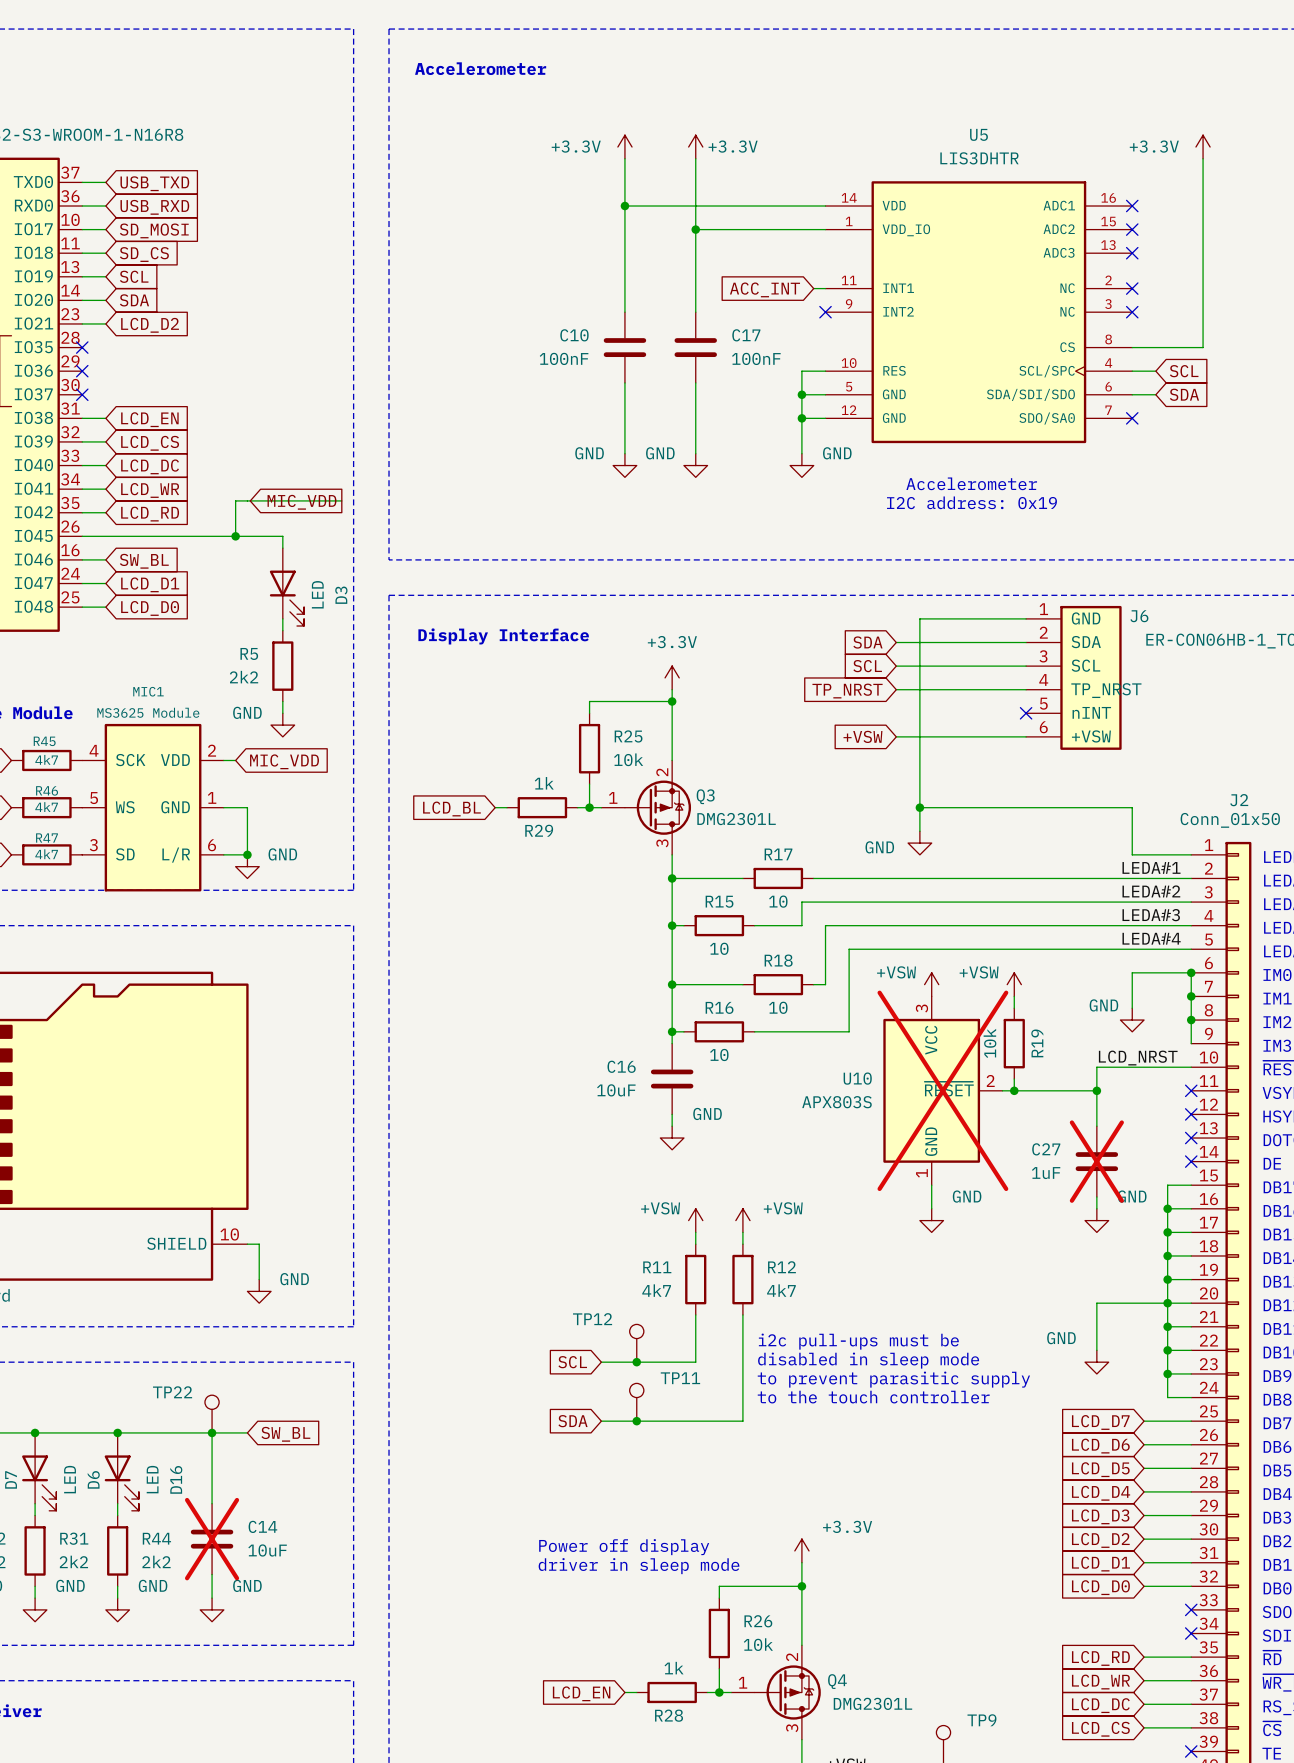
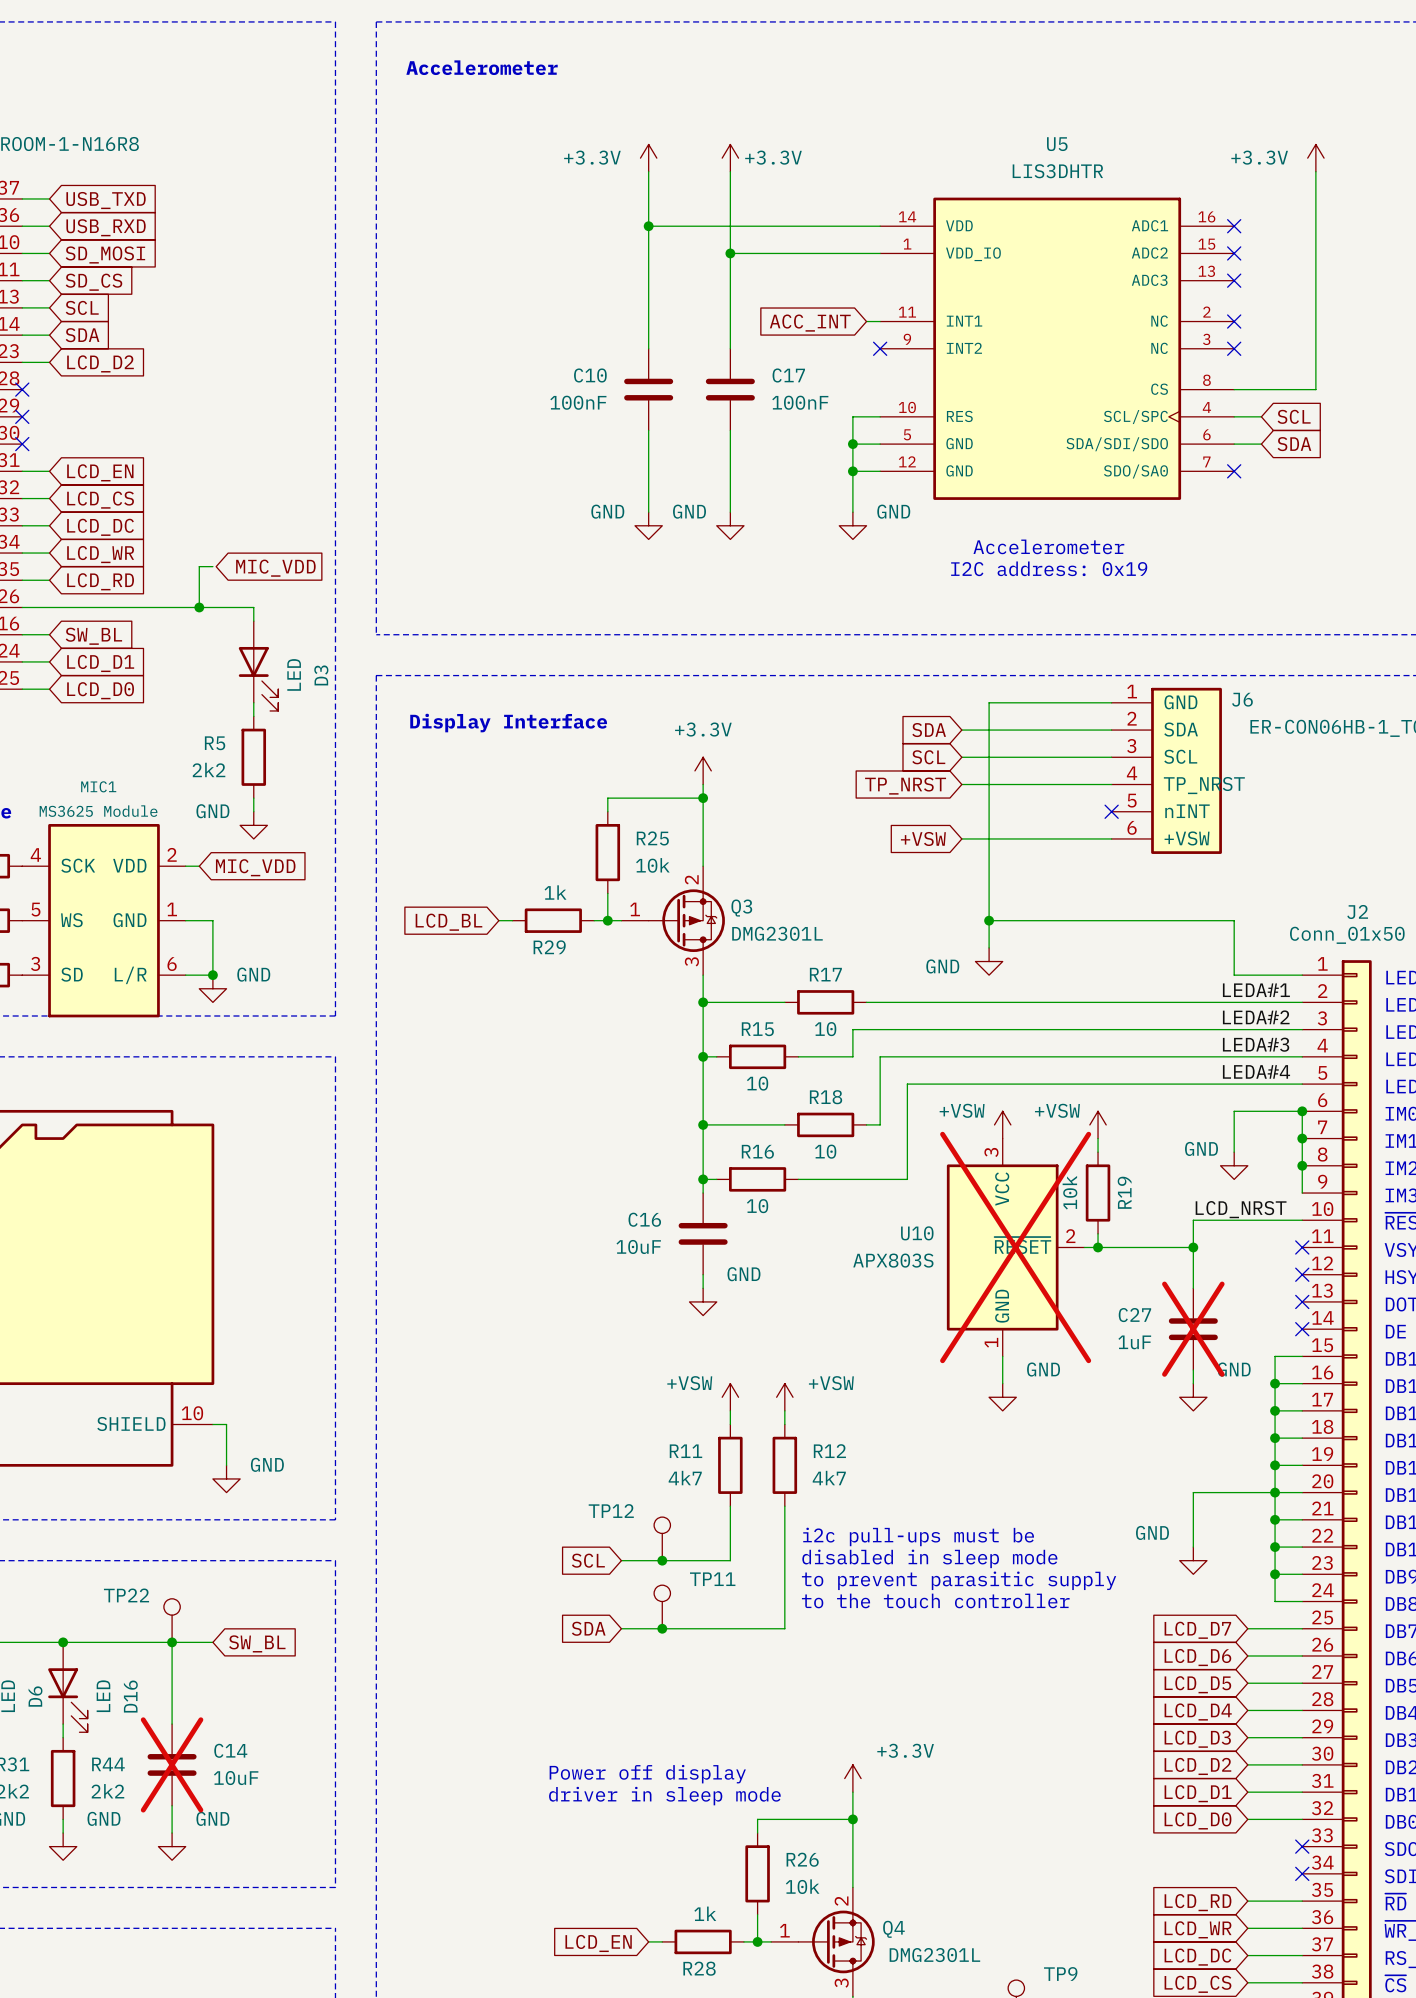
wire: (247, 500) (341, 500) -> none

